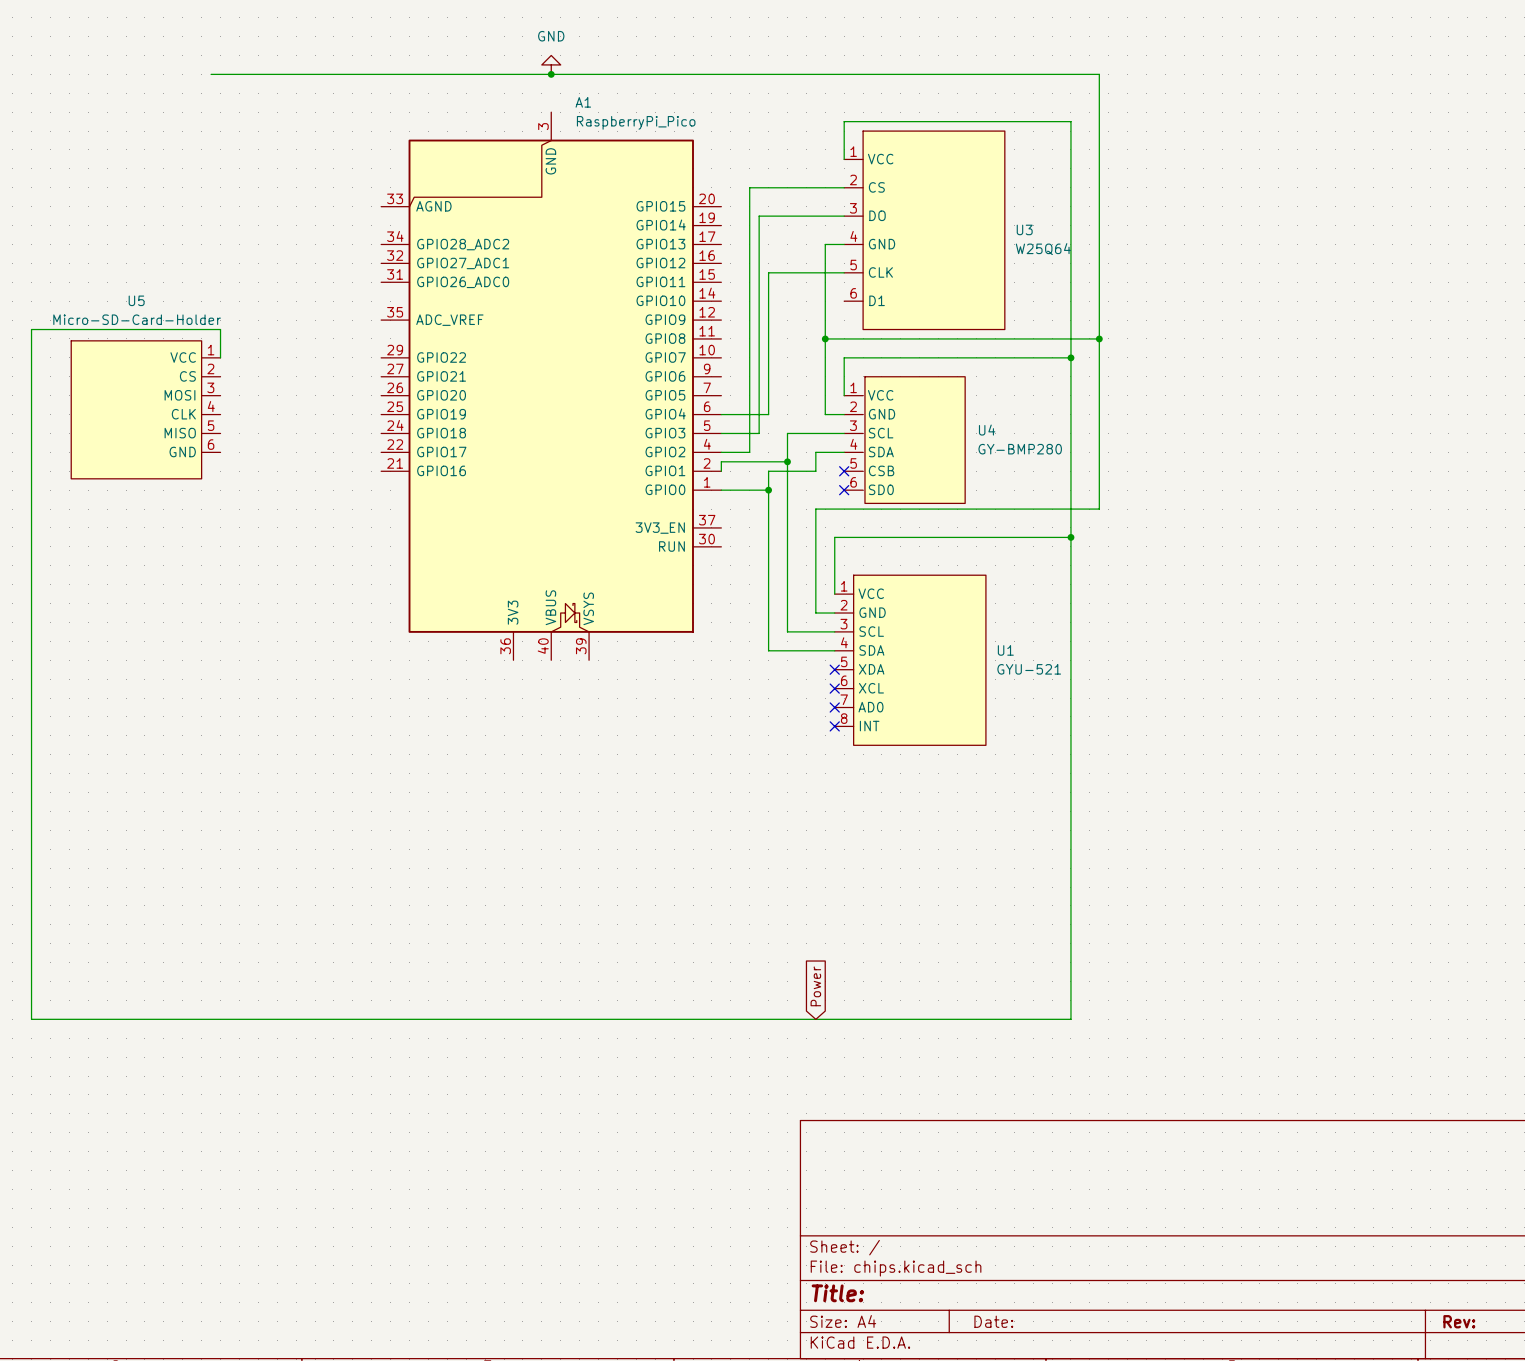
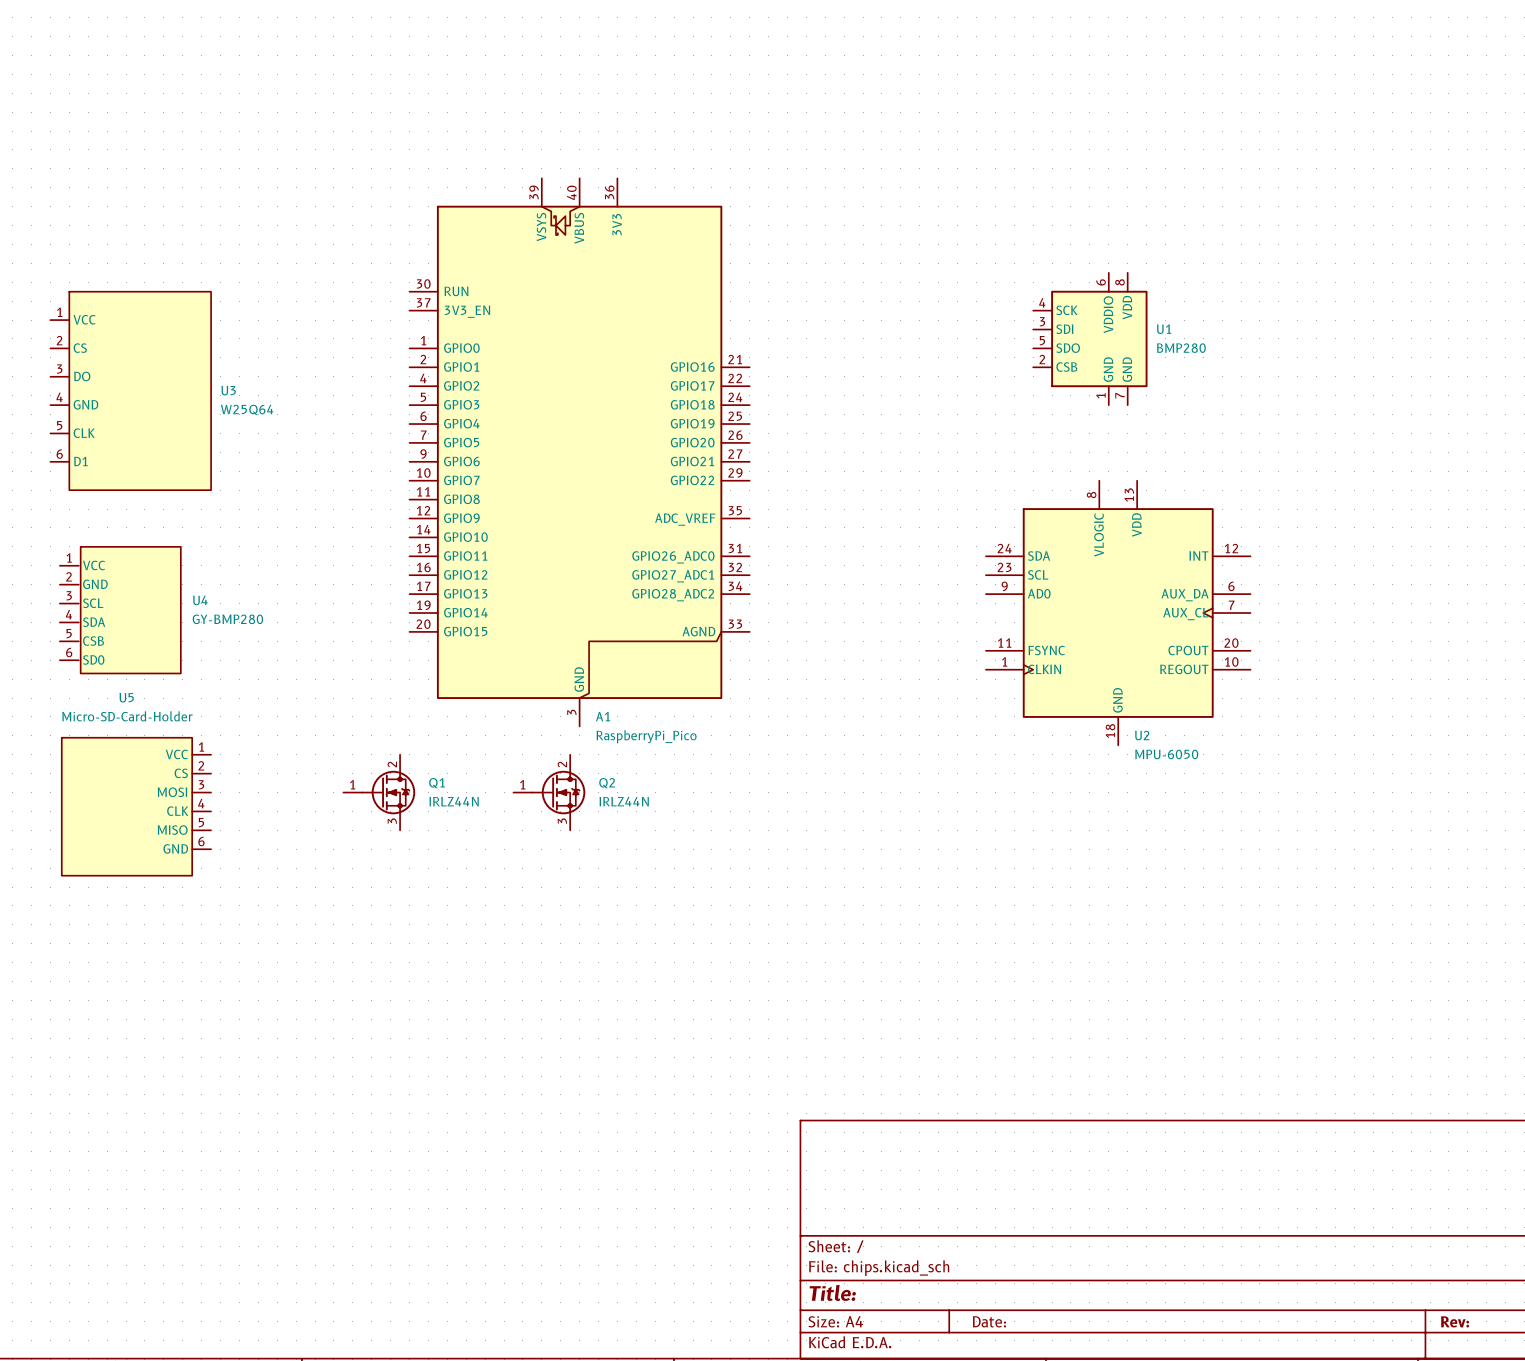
power symbol: GND (551, 64) -> none
wire: (211, 74) (1099, 74) (1099, 509) (815, 509) (815, 613) (834, 613) -> none
junction: (551, 74) -> none
A1 name position: A1 (583, 102) -> A1 (603, 716)
A1 value position: RaspberryPi_Pico (636, 122) -> RaspberryPi_Pico (646, 736)
wire: (844, 159) (844, 121) (1070, 121) (1070, 1019) (31, 1019) (31, 329) (220, 329) (220, 357) -> none
wire: (844, 187) (749, 187) (749, 452) (721, 452) -> none
wire: (844, 216) (759, 216) (759, 433) (721, 433) -> none
U3 position: (924, 230) -> (130, 390)
wire: (844, 244) (825, 244) (825, 414) (844, 414) -> none
wire: (844, 272) (768, 272) (768, 414) (721, 414) -> none
wire: (825, 338) (1099, 338) -> none
junction: (825, 338) -> none
junction: (1099, 338) -> none
wire: (1070, 357) (844, 357) (844, 395) -> none
junction: (1070, 357) -> none
A1 rotation: 0° (551, 386) -> 180° (579, 452)
U5 position: (145, 409) -> (136, 806)
wire: (844, 433) (787, 433) (787, 631) (834, 631) -> none
U4 position: (904, 440) -> (120, 610)
wire: (844, 452) (815, 452) (815, 471) (768, 471) (768, 650) (834, 650) -> none
wire: (787, 461) (721, 461) (721, 471) -> none
junction: (787, 461) -> none
no-connect mark: (844, 471) -> none
wire: (721, 490) (768, 490) -> none
junction: (768, 490) -> none
no-connect mark: (844, 490) -> none
wire: (1070, 537) (834, 537) (834, 594) -> none
junction: (1070, 537) -> none
U1 symbol: [834, 575, 986, 746] -> [1033, 272, 1148, 406]
U2: none -> MPU-6050 (1118, 613)
U1 name position: U1 (1005, 650) -> U1 (1164, 329)
no-connect mark: (834, 669) -> none
U1 value: GYU-521 (1029, 669) -> BMP280 (1181, 348)
no-connect mark: (834, 688) -> none
no-connect mark: (834, 707) -> none
no-connect mark: (834, 726) -> none
Q1: none -> IRLZ44N (379, 792)
Q2: none -> IRLZ44N (549, 792)
global label: Power (815, 986) -> none

